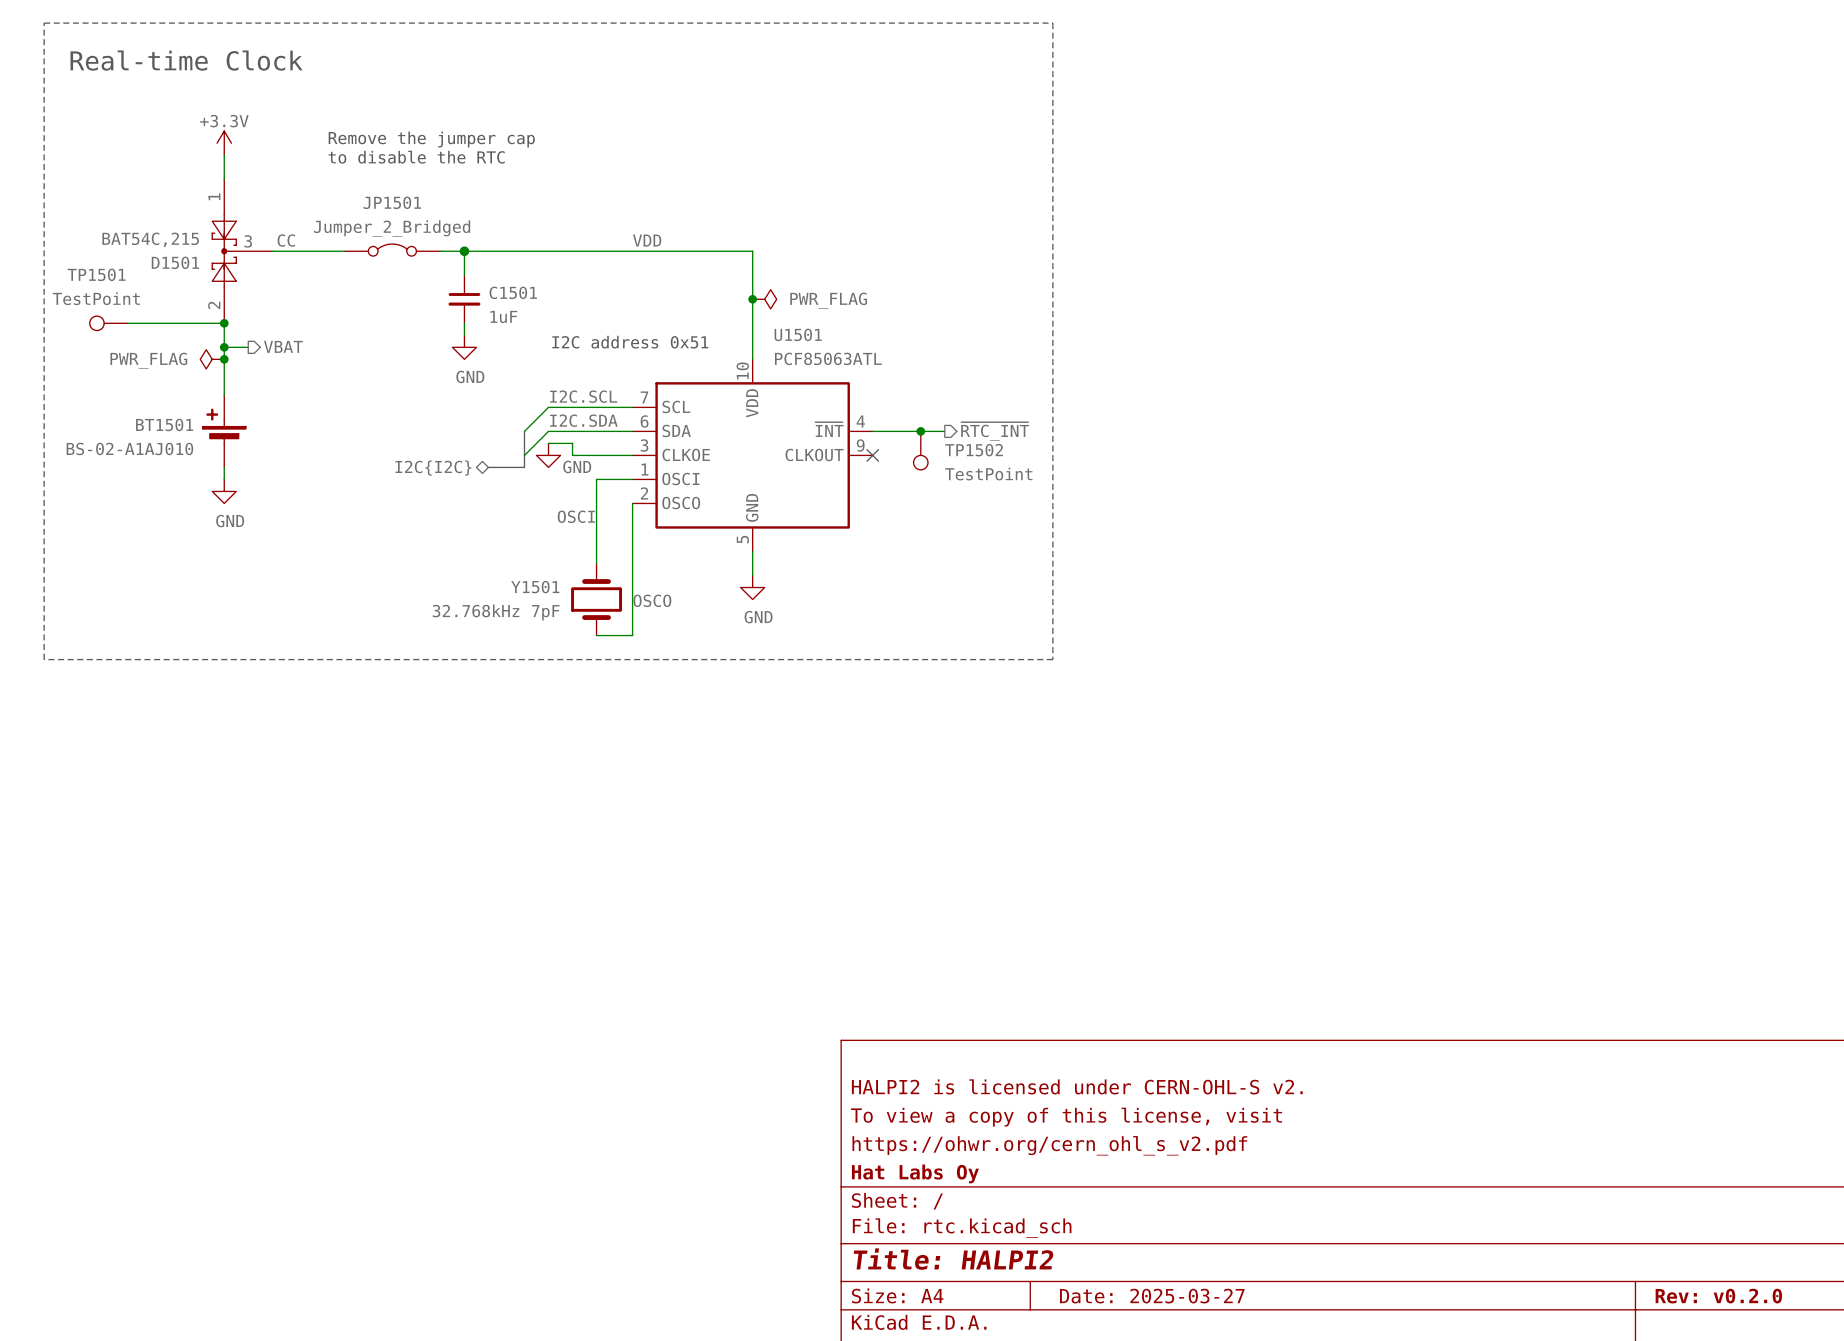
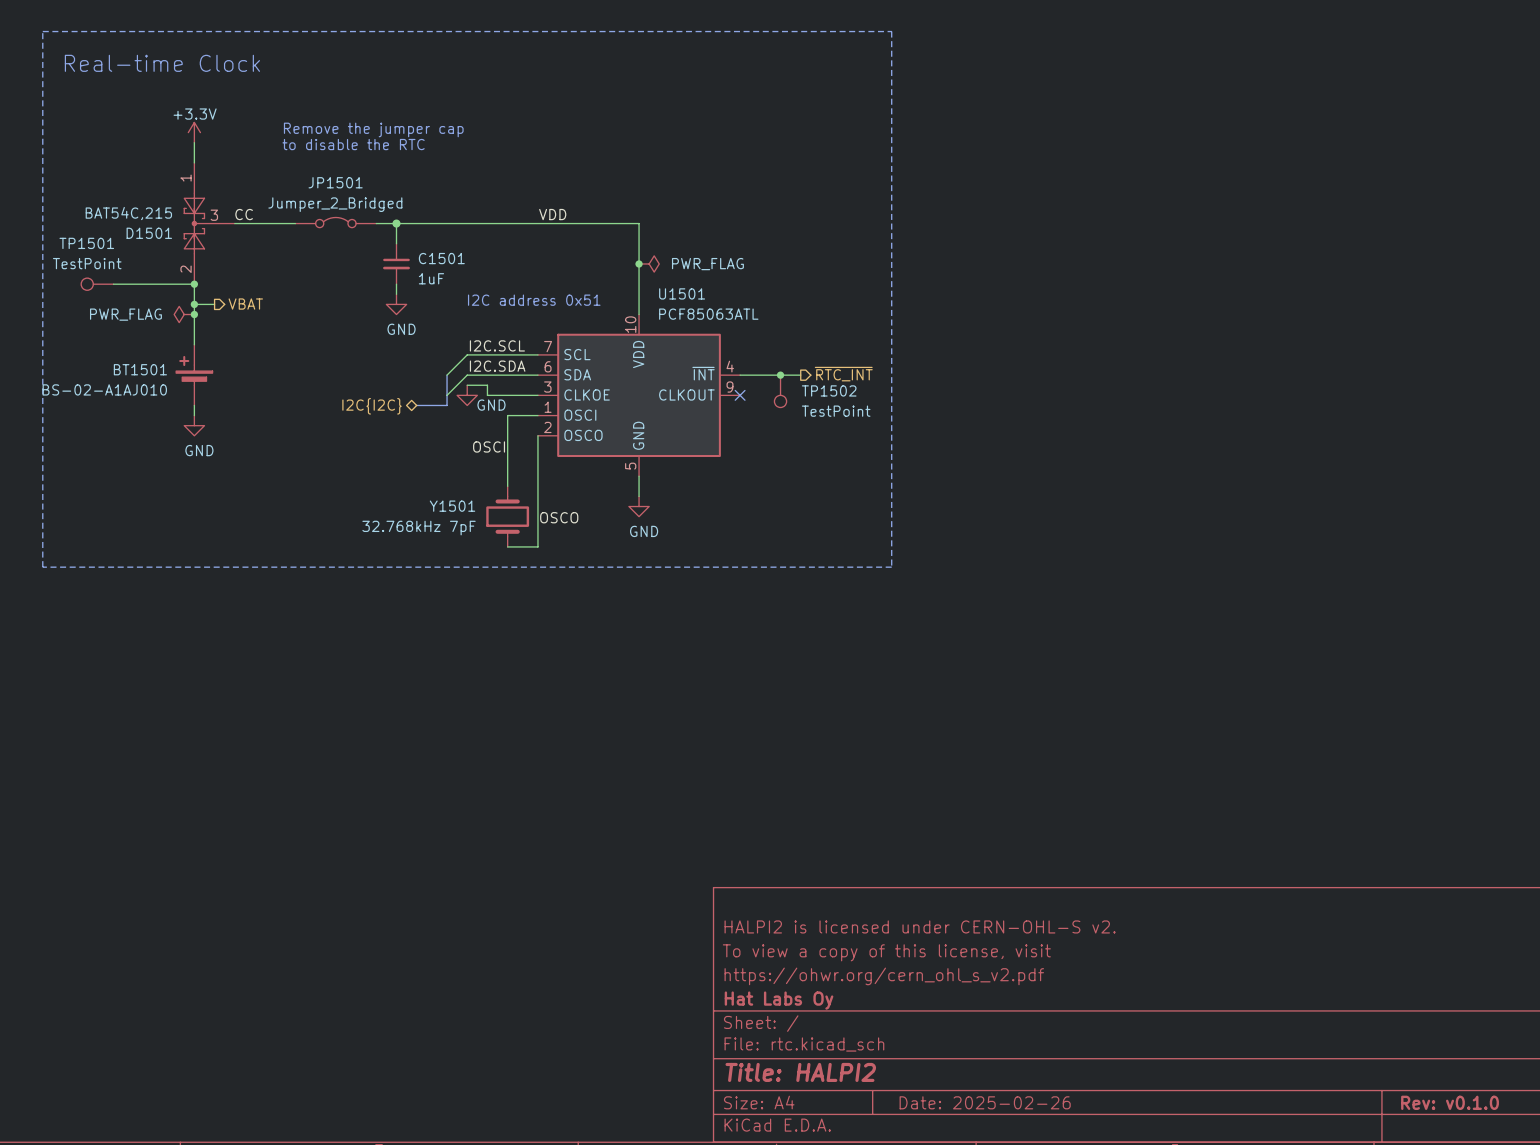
title block: Date: 2025-03-27 (1152, 1296) -> Date: 2025-02-26 (985, 1102)
title block: Rev: v0.2.0 (1718, 1296) -> Rev: v0.1.0 (1450, 1102)

